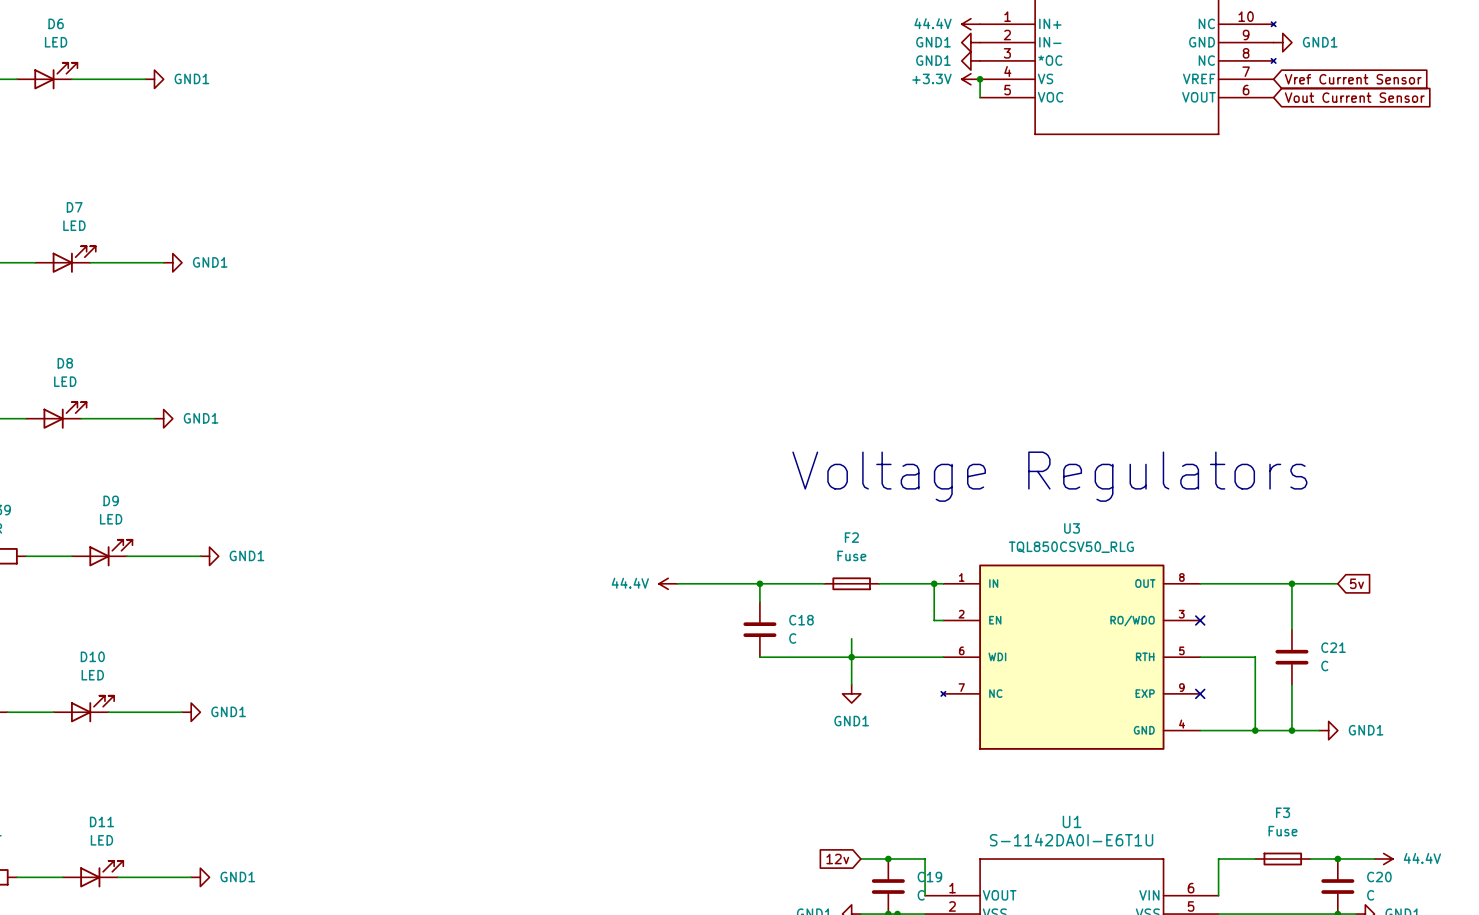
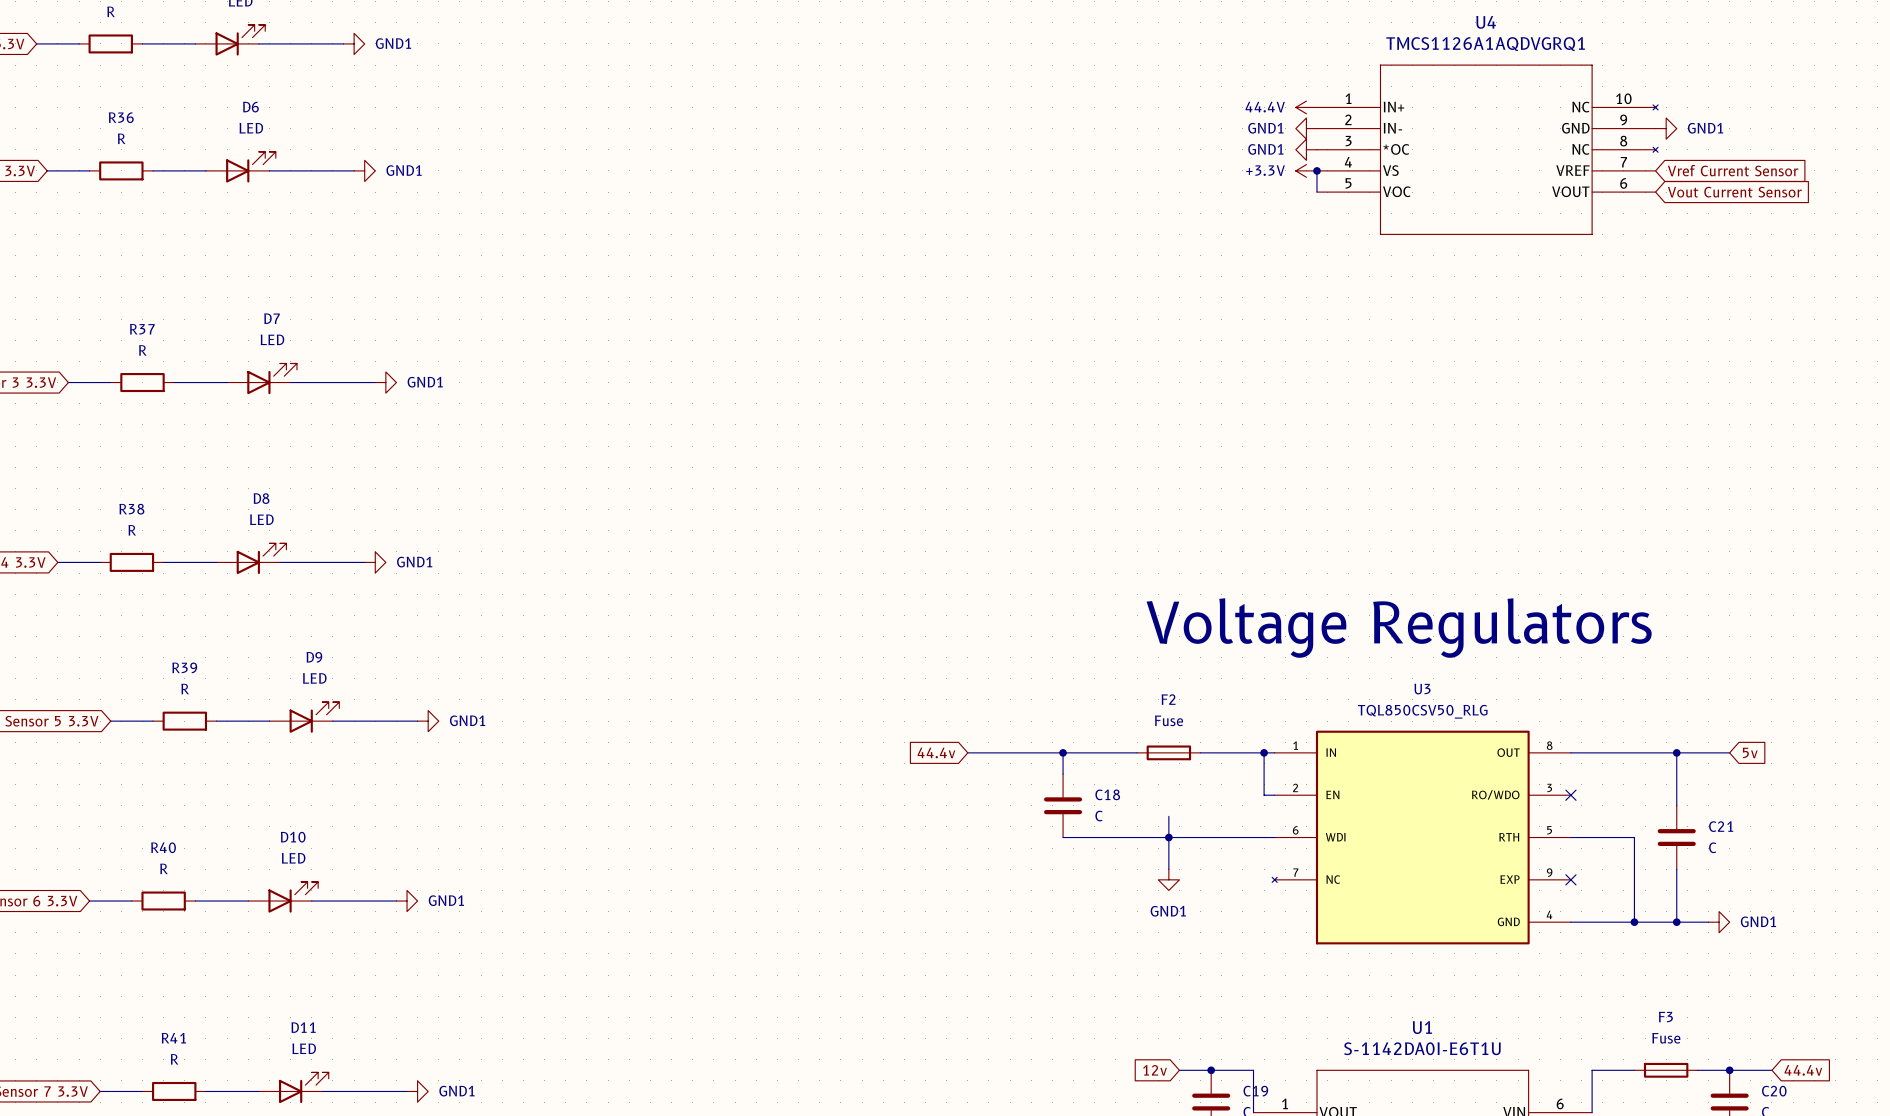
global label: none -> 44.4v (936, 752)
power symbol: 44.4V (668, 583) -> none
global label: none -> 44.4v (1803, 1070)
power symbol: 44.4V (1383, 859) -> none

